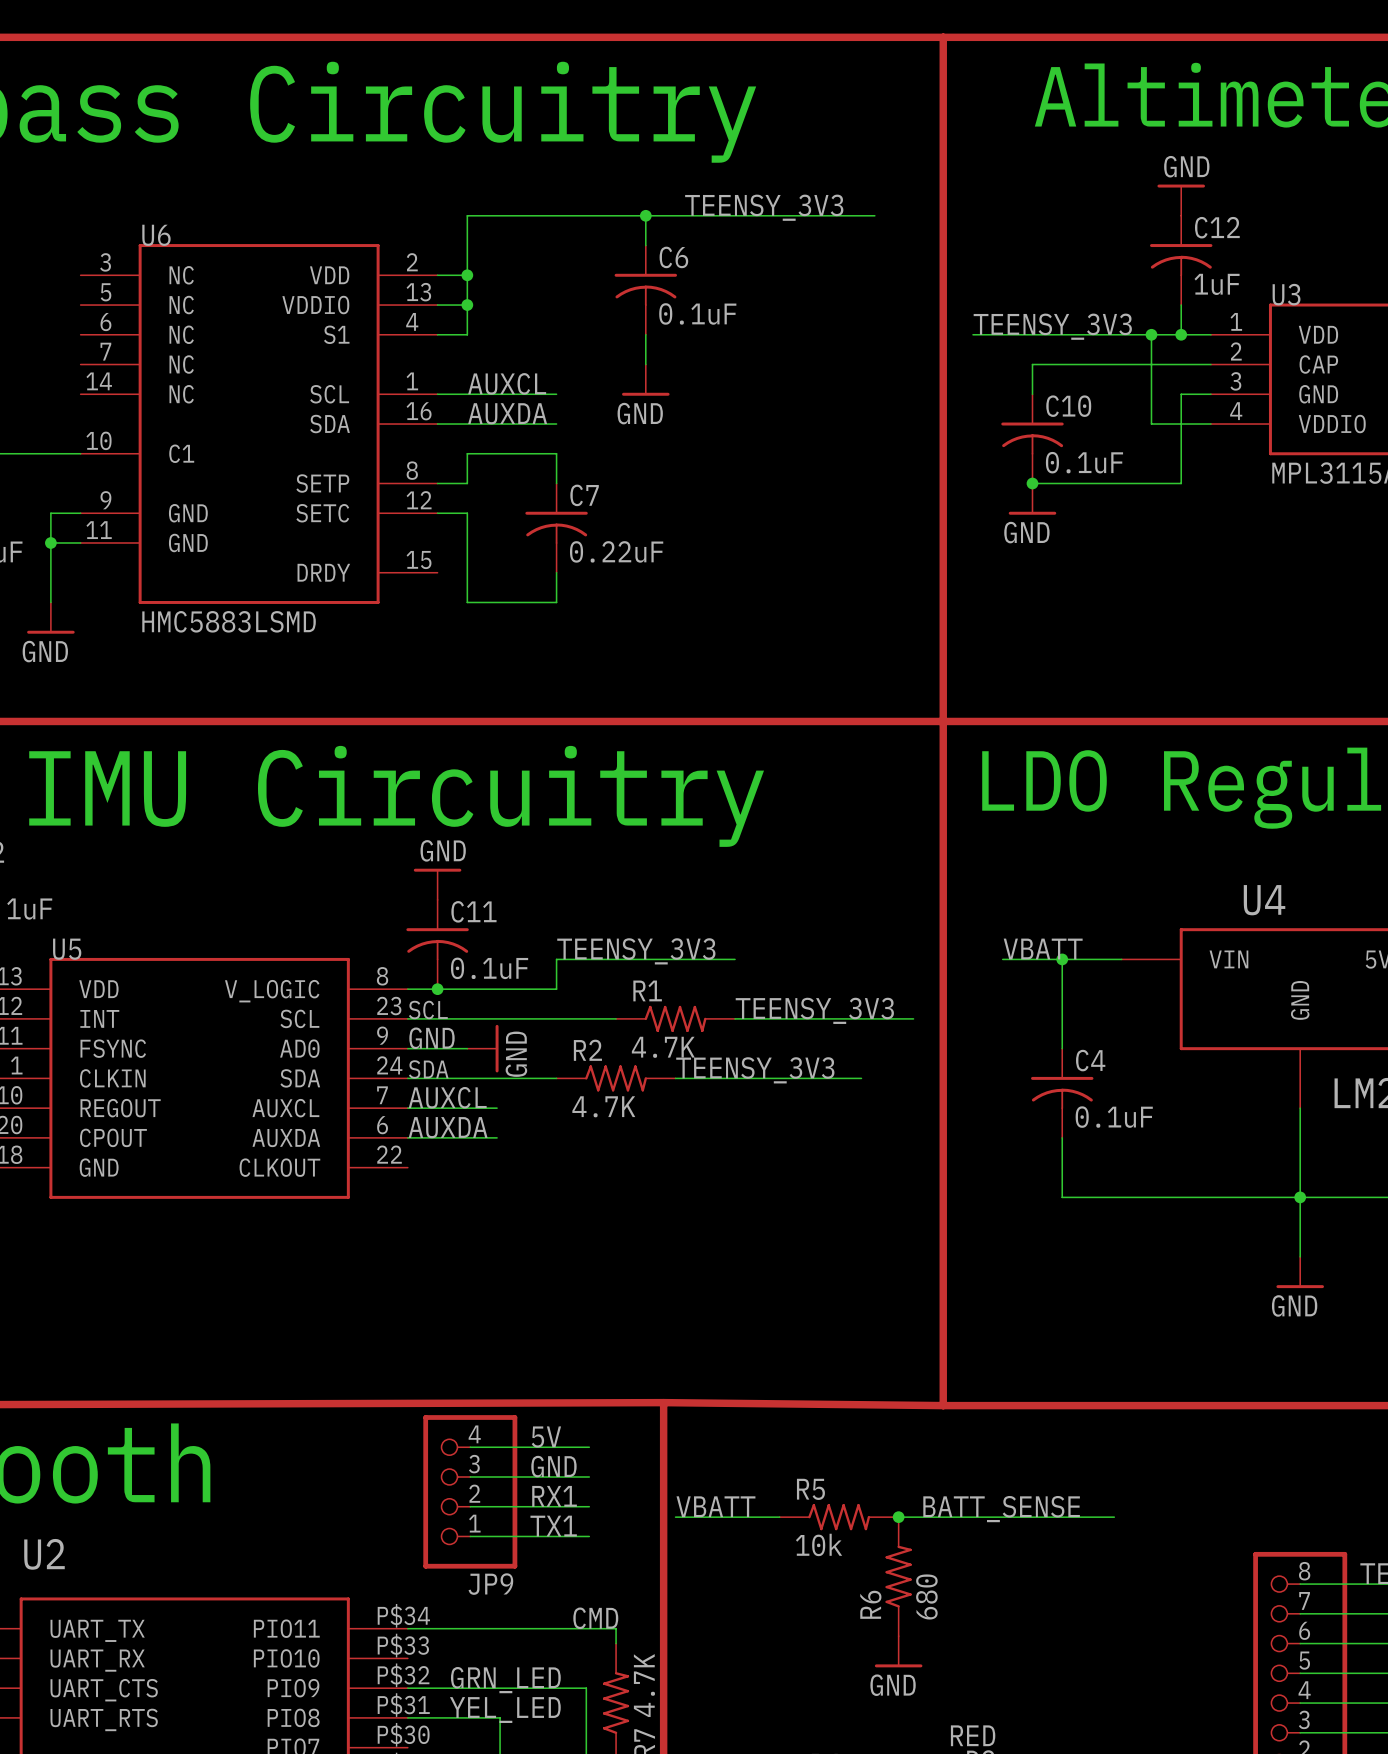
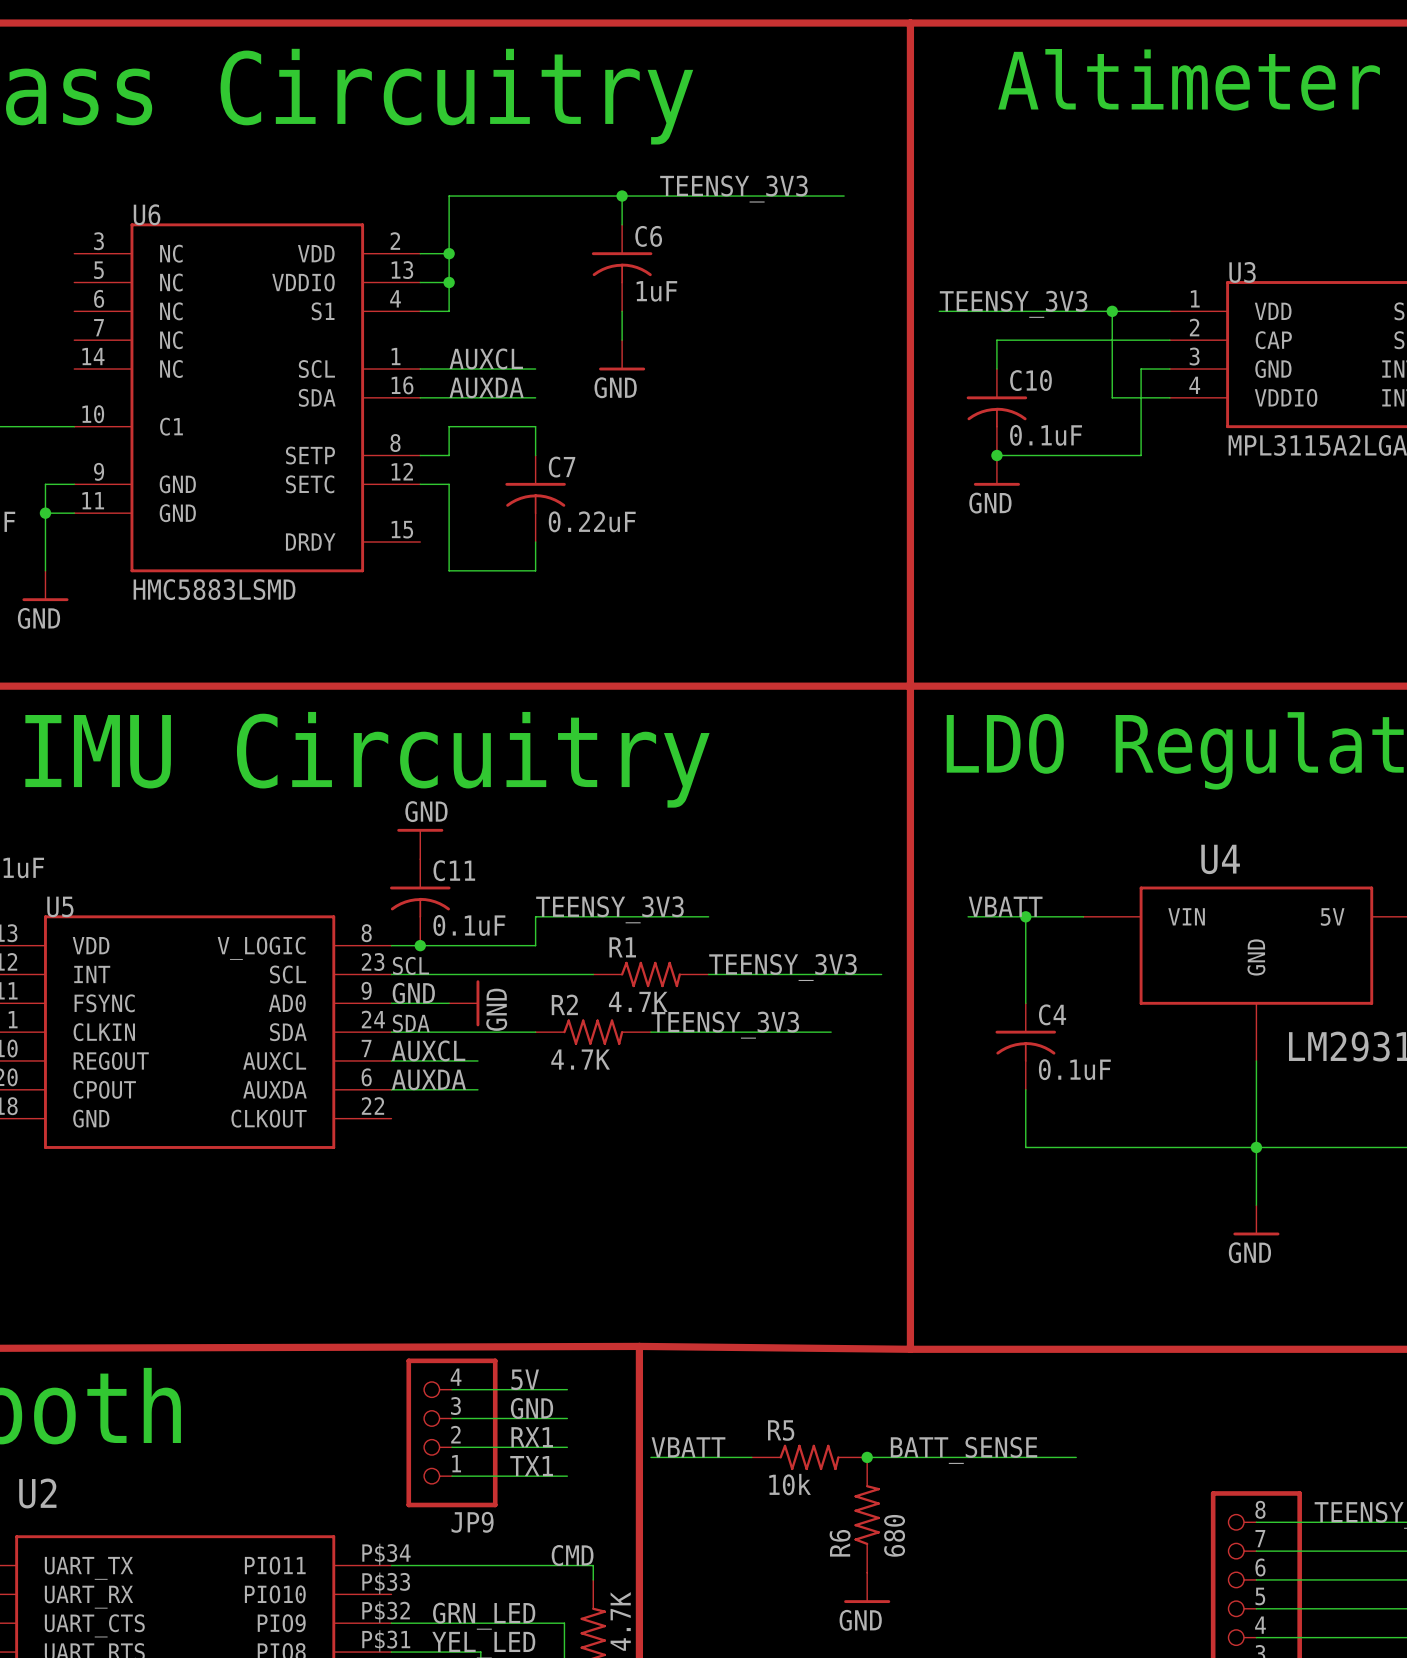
power symbol: GND (1181, 200) -> none
C12: 1uF (1181, 260) -> none
wire: (1181, 305) (1181, 334) -> none
C6 value: 0.1uF (697, 313) -> 1uF (656, 291)
junction: (1181, 334) -> none

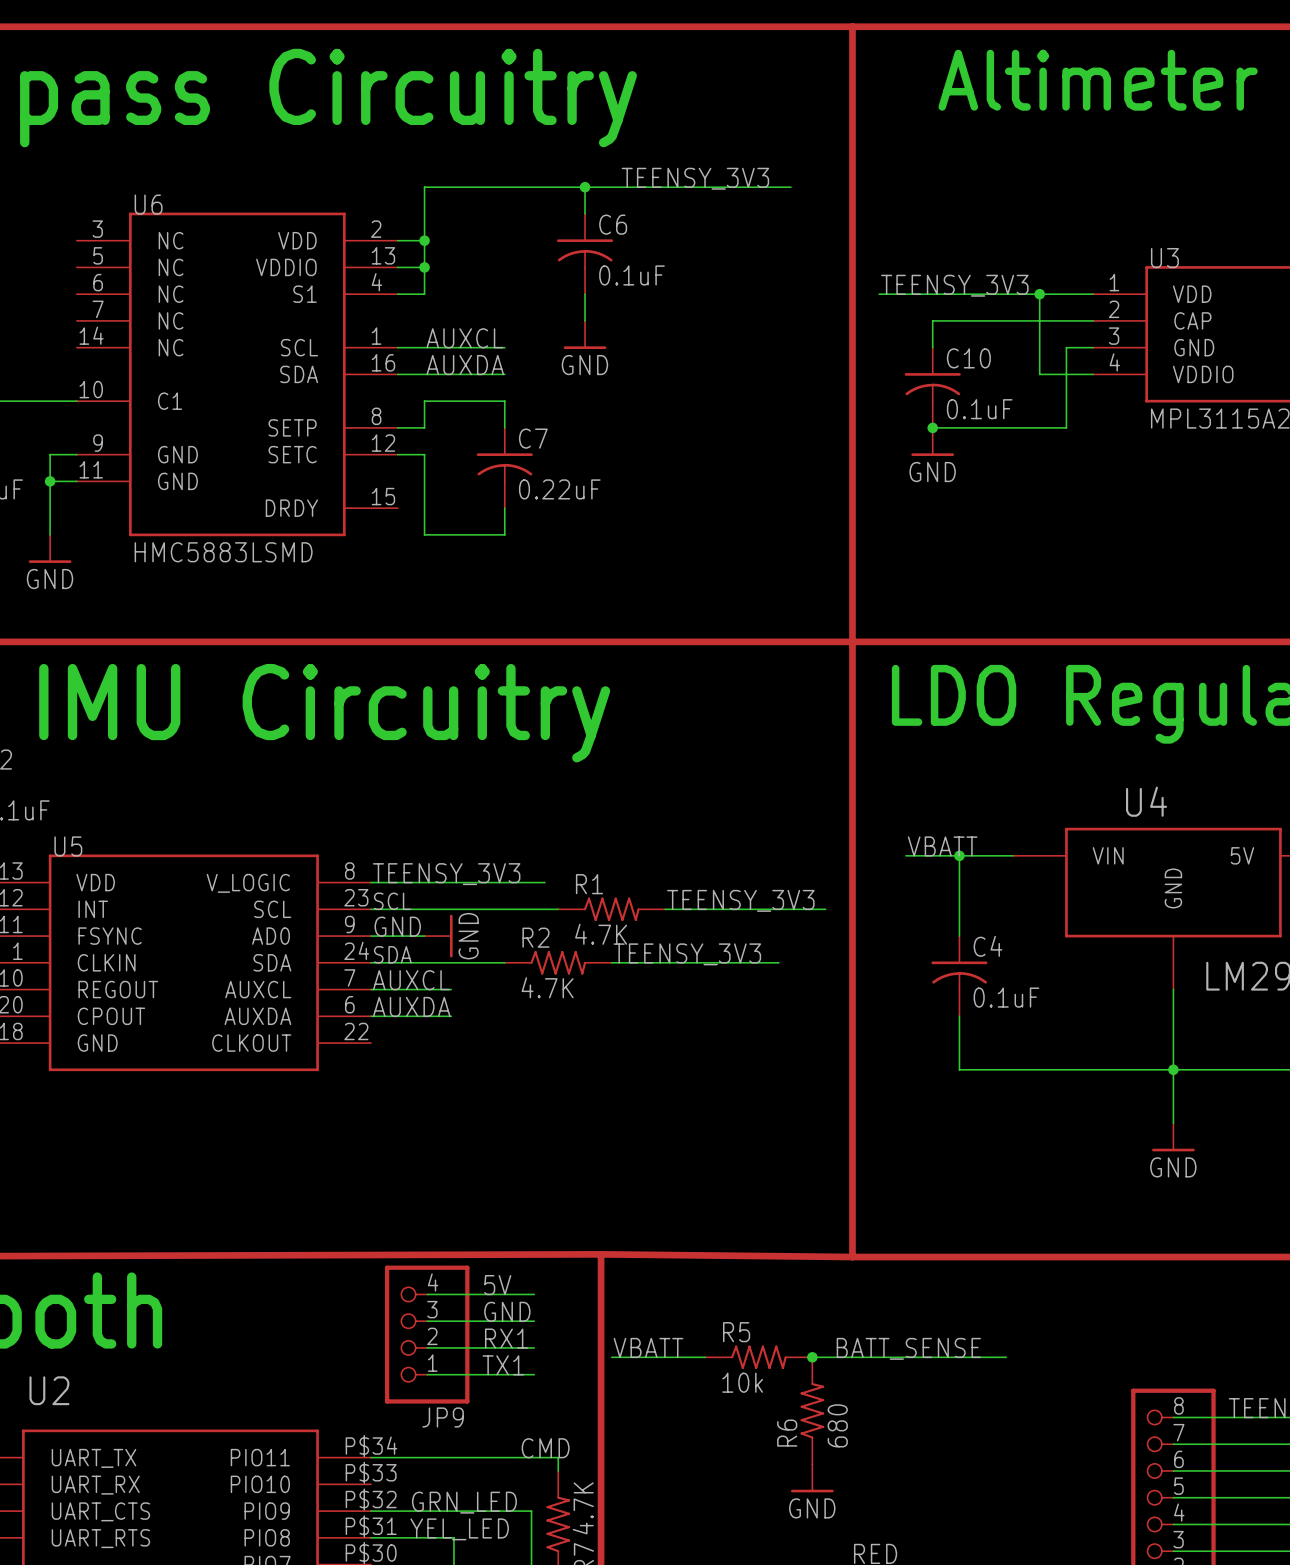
C6 value: 1uF (656, 291) -> 0.1uF (632, 275)
power symbol: GND (420, 844) -> none
C11: 0.1uF (420, 902) -> none
label position: TEENSY_3V3 (609, 909) -> TEENSY_3V3 (446, 874)
wire: (708, 916) (535, 916) (535, 945) -> (544, 882) (504, 882)
junction: (420, 945) -> none

